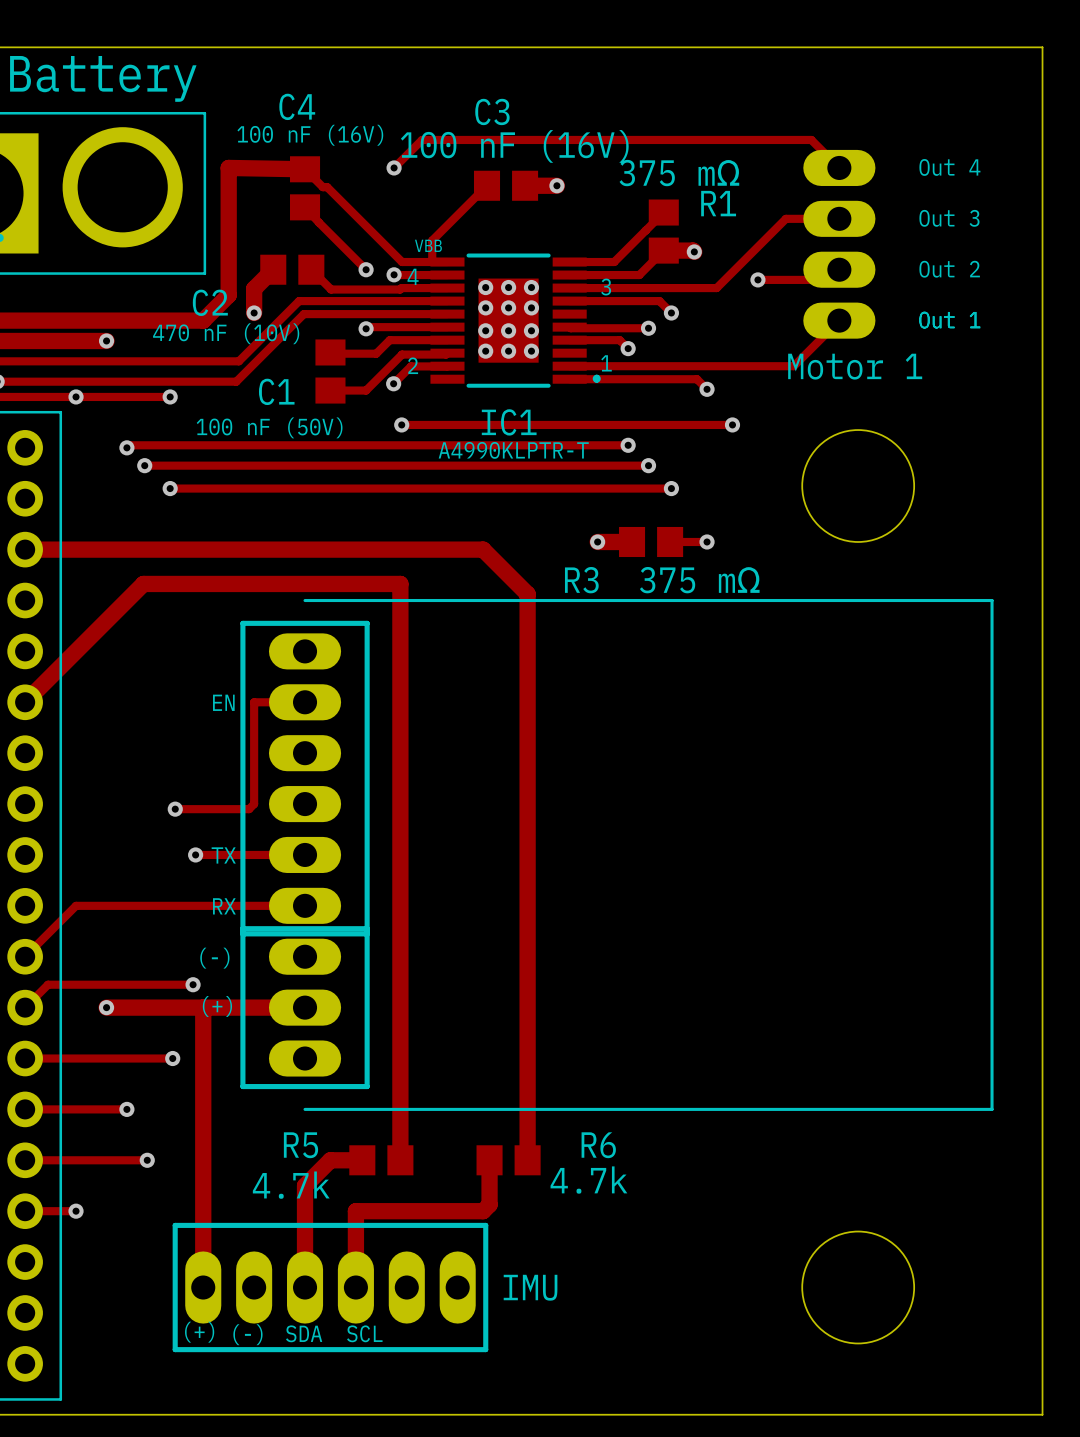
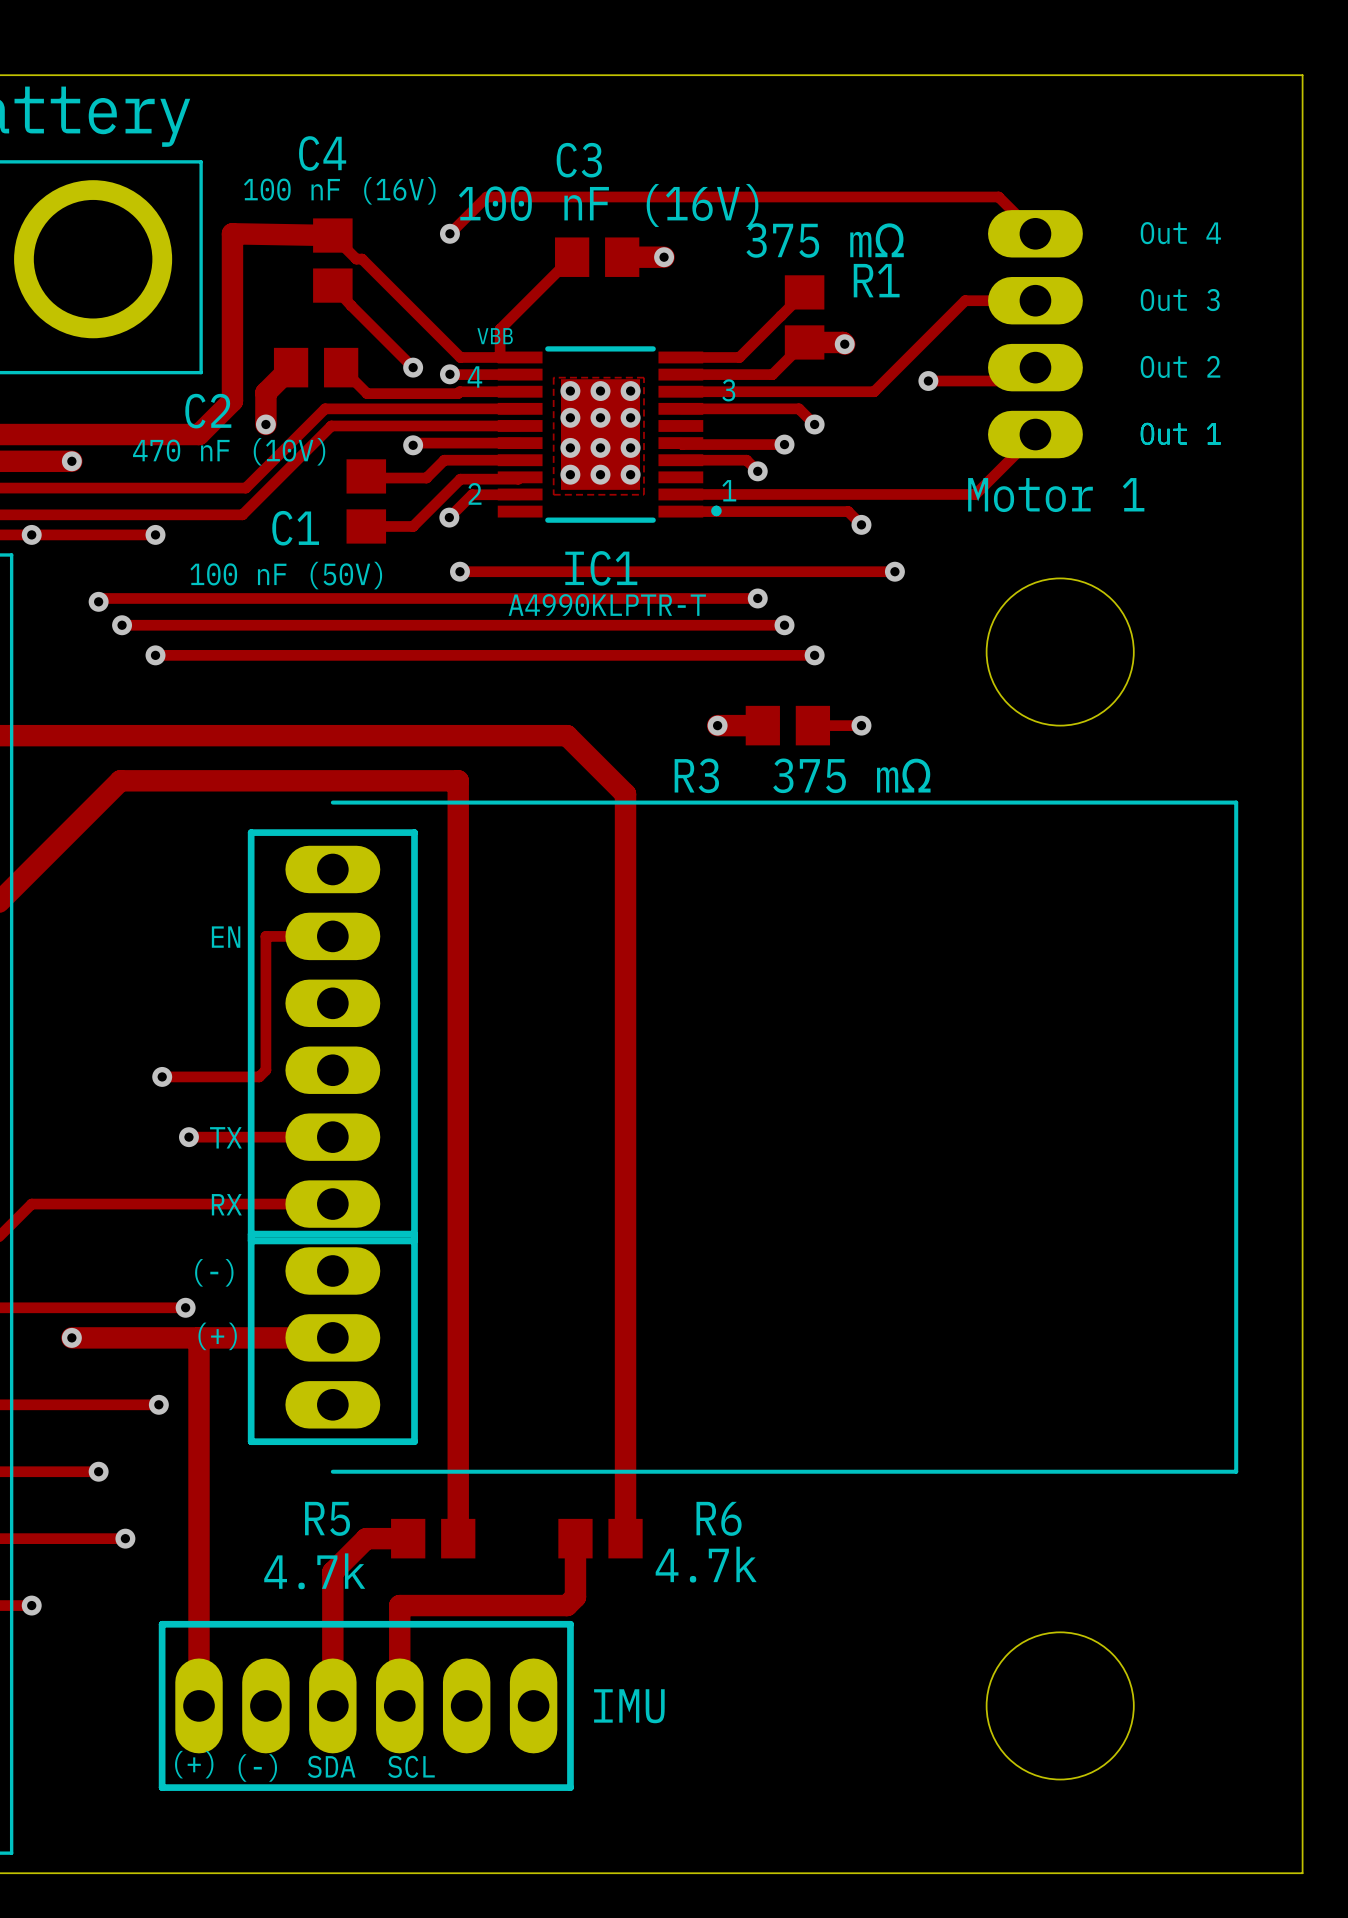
zone outline: none -> (553, 377) (553, 494) (643, 494) (643, 377) (553, 377)

